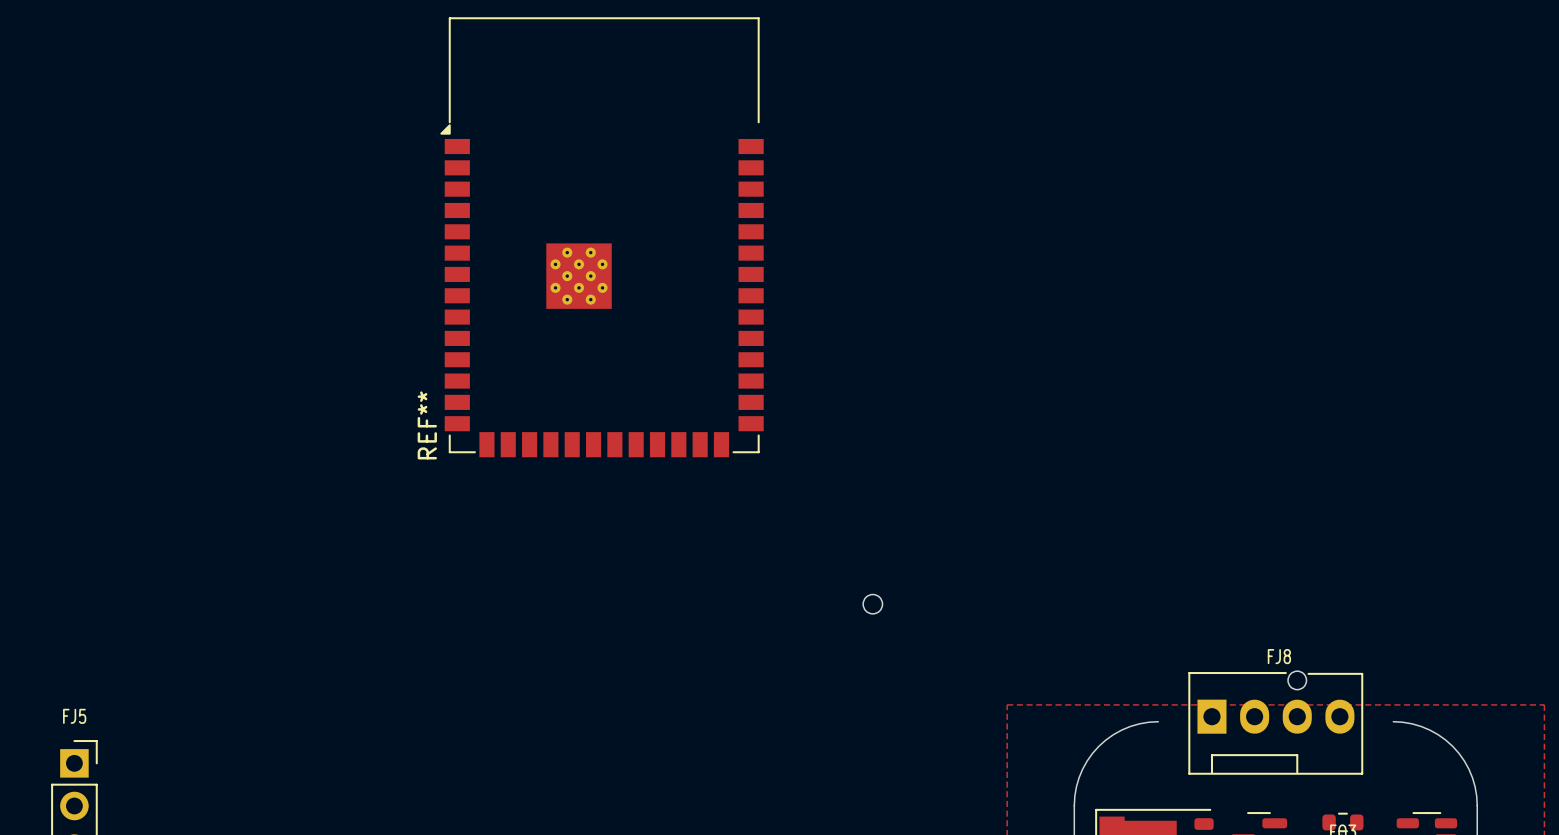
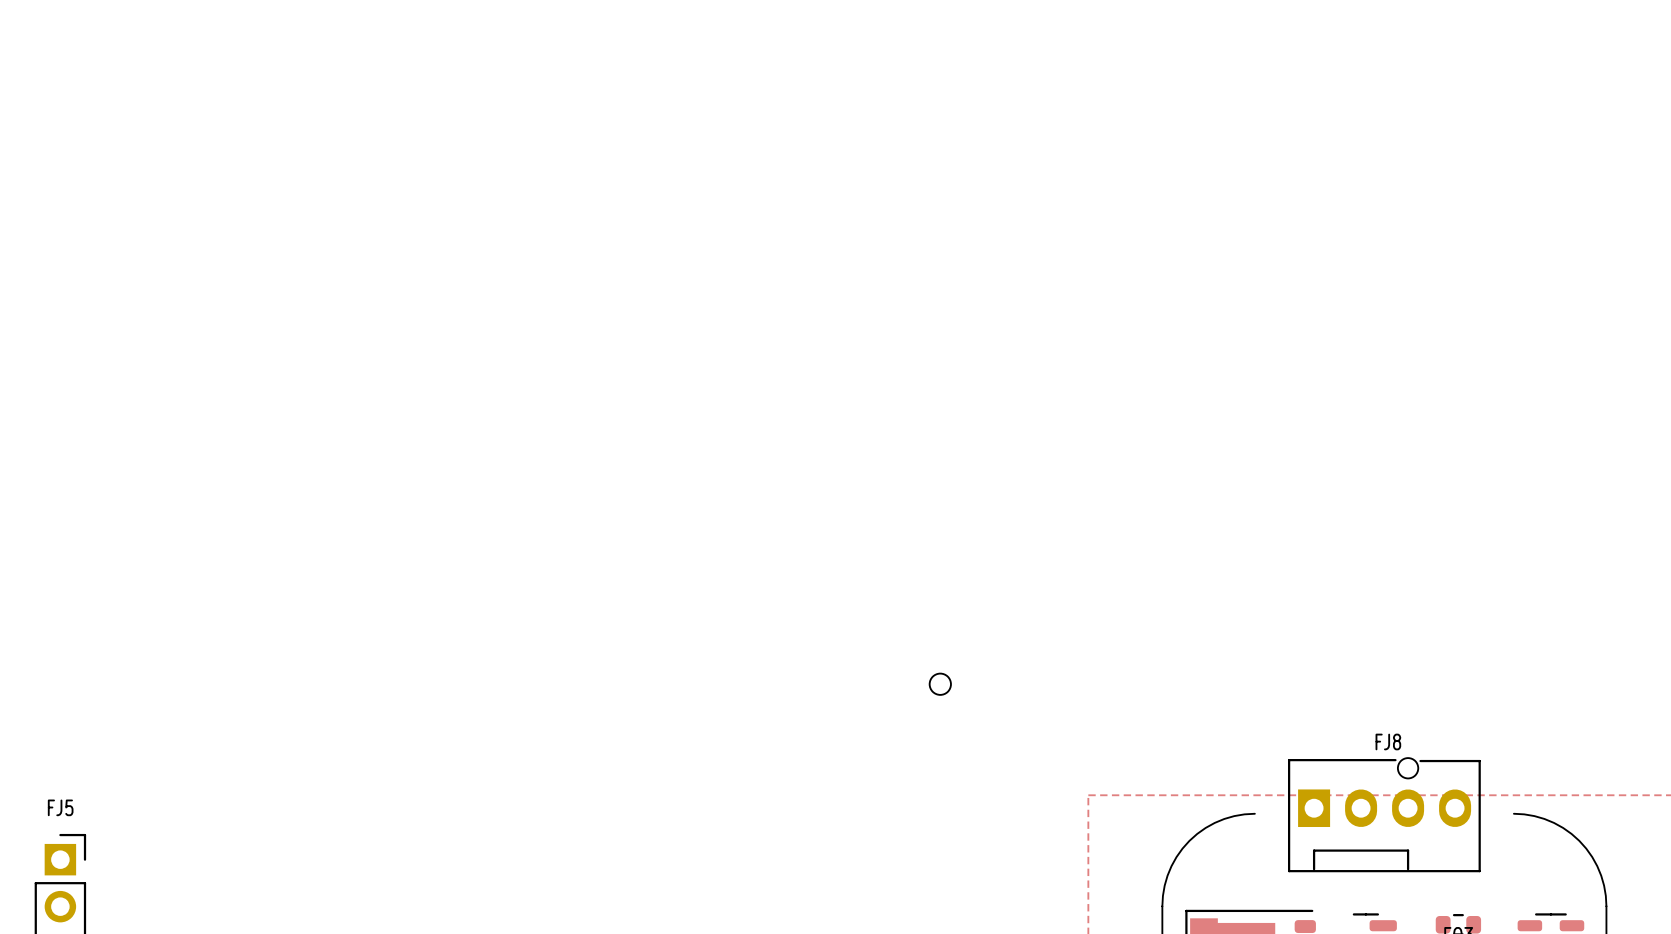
REF**: (602, 237) -> none

